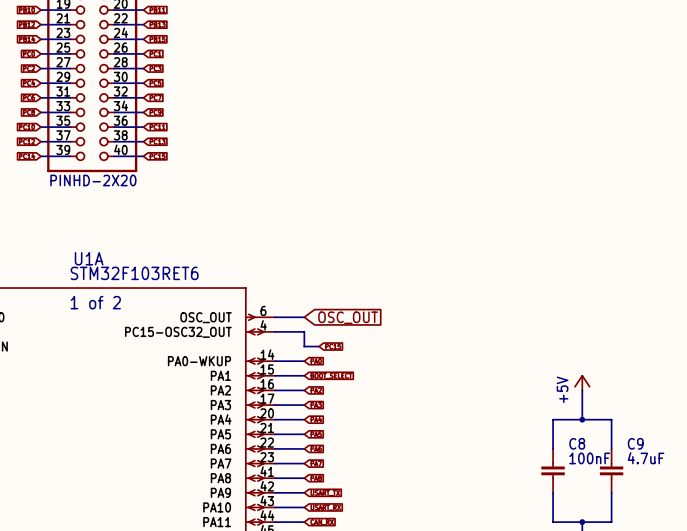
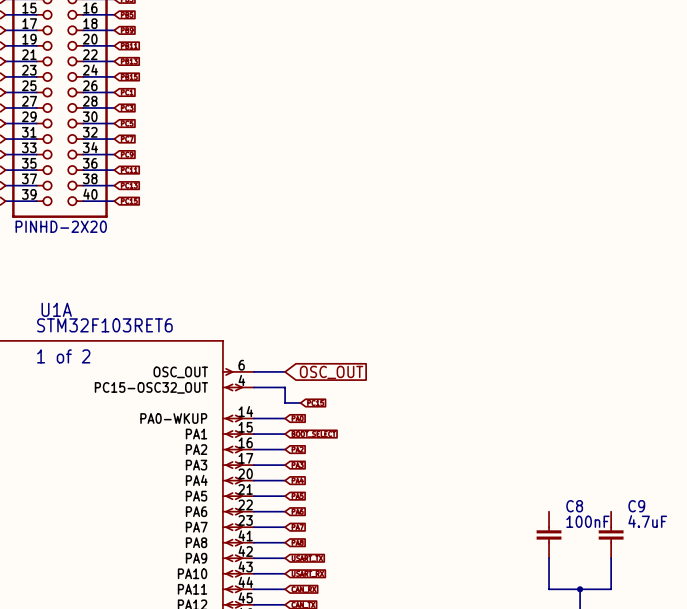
power symbol: +5V (582, 382) -> none
wire: (582, 390) (582, 419) -> none
junction: (582, 419) -> none
wire: (553, 448) (553, 419) (611, 419) (611, 448) -> none

